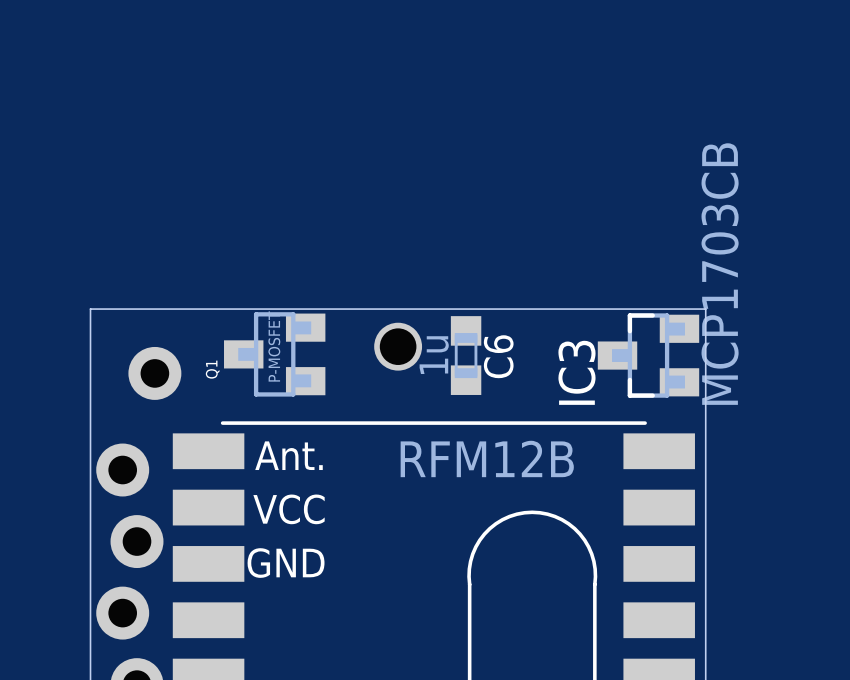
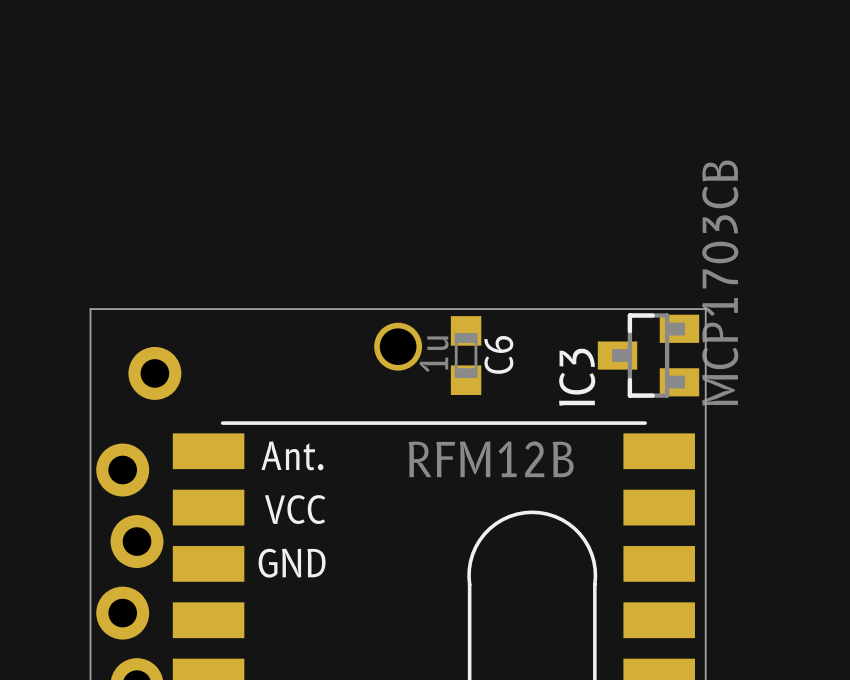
Q1: P-MOSFET (274, 354) -> none

